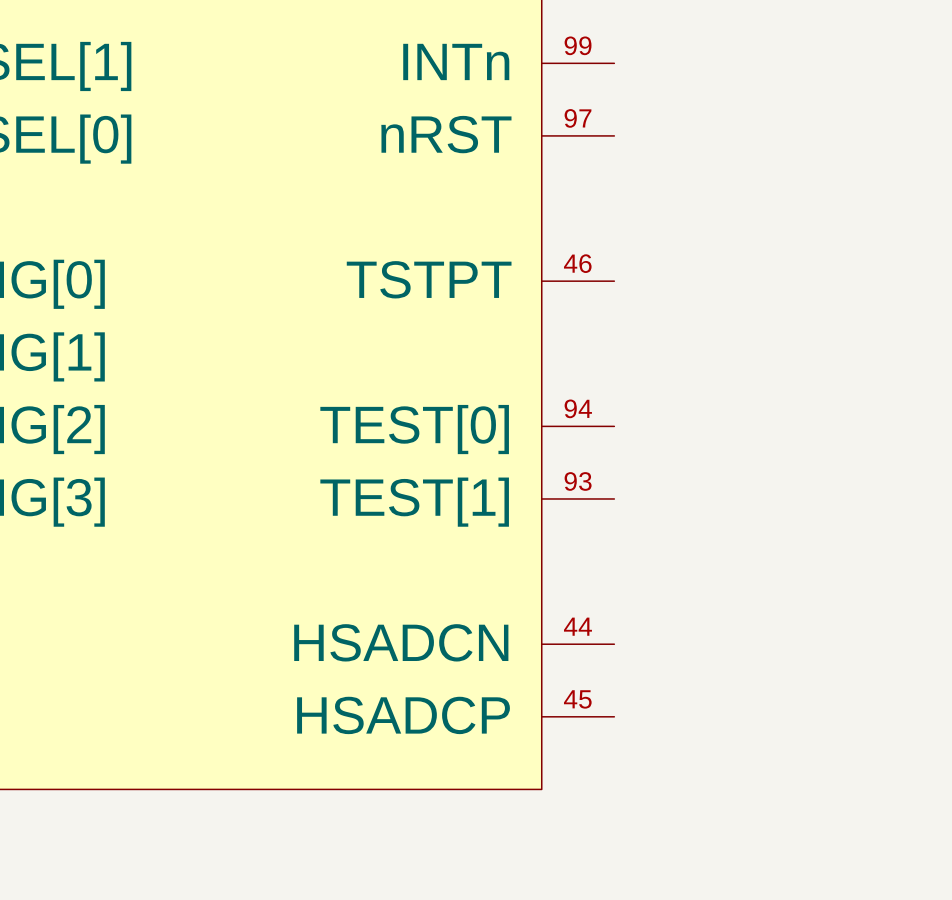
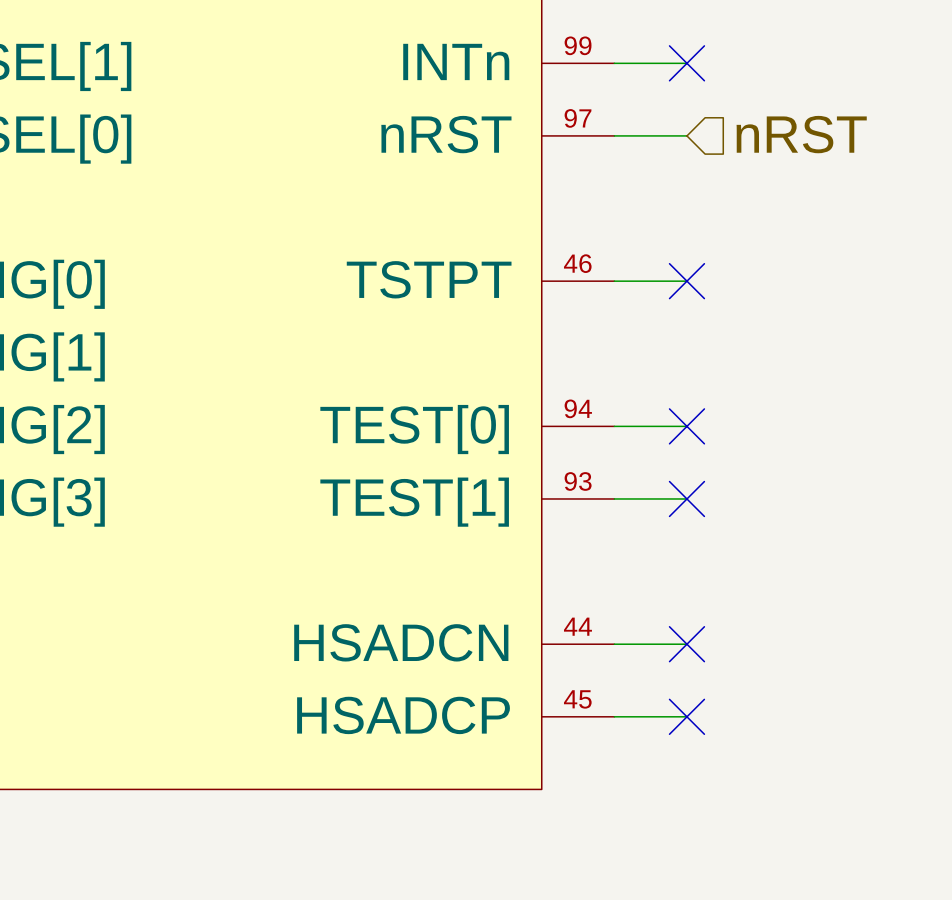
wire: none -> (614, 63) (686, 63)
no-connect mark: none -> (686, 63)
hierarchical label: none -> nRST (801, 134)
wire: none -> (614, 135) (686, 135)
wire: none -> (614, 281) (686, 281)
no-connect mark: none -> (686, 281)
wire: none -> (614, 426) (686, 426)
no-connect mark: none -> (686, 426)
wire: none -> (614, 498) (686, 498)
no-connect mark: none -> (686, 498)
wire: none -> (614, 644) (686, 644)
no-connect mark: none -> (686, 644)
wire: none -> (614, 716) (686, 716)
no-connect mark: none -> (686, 716)

